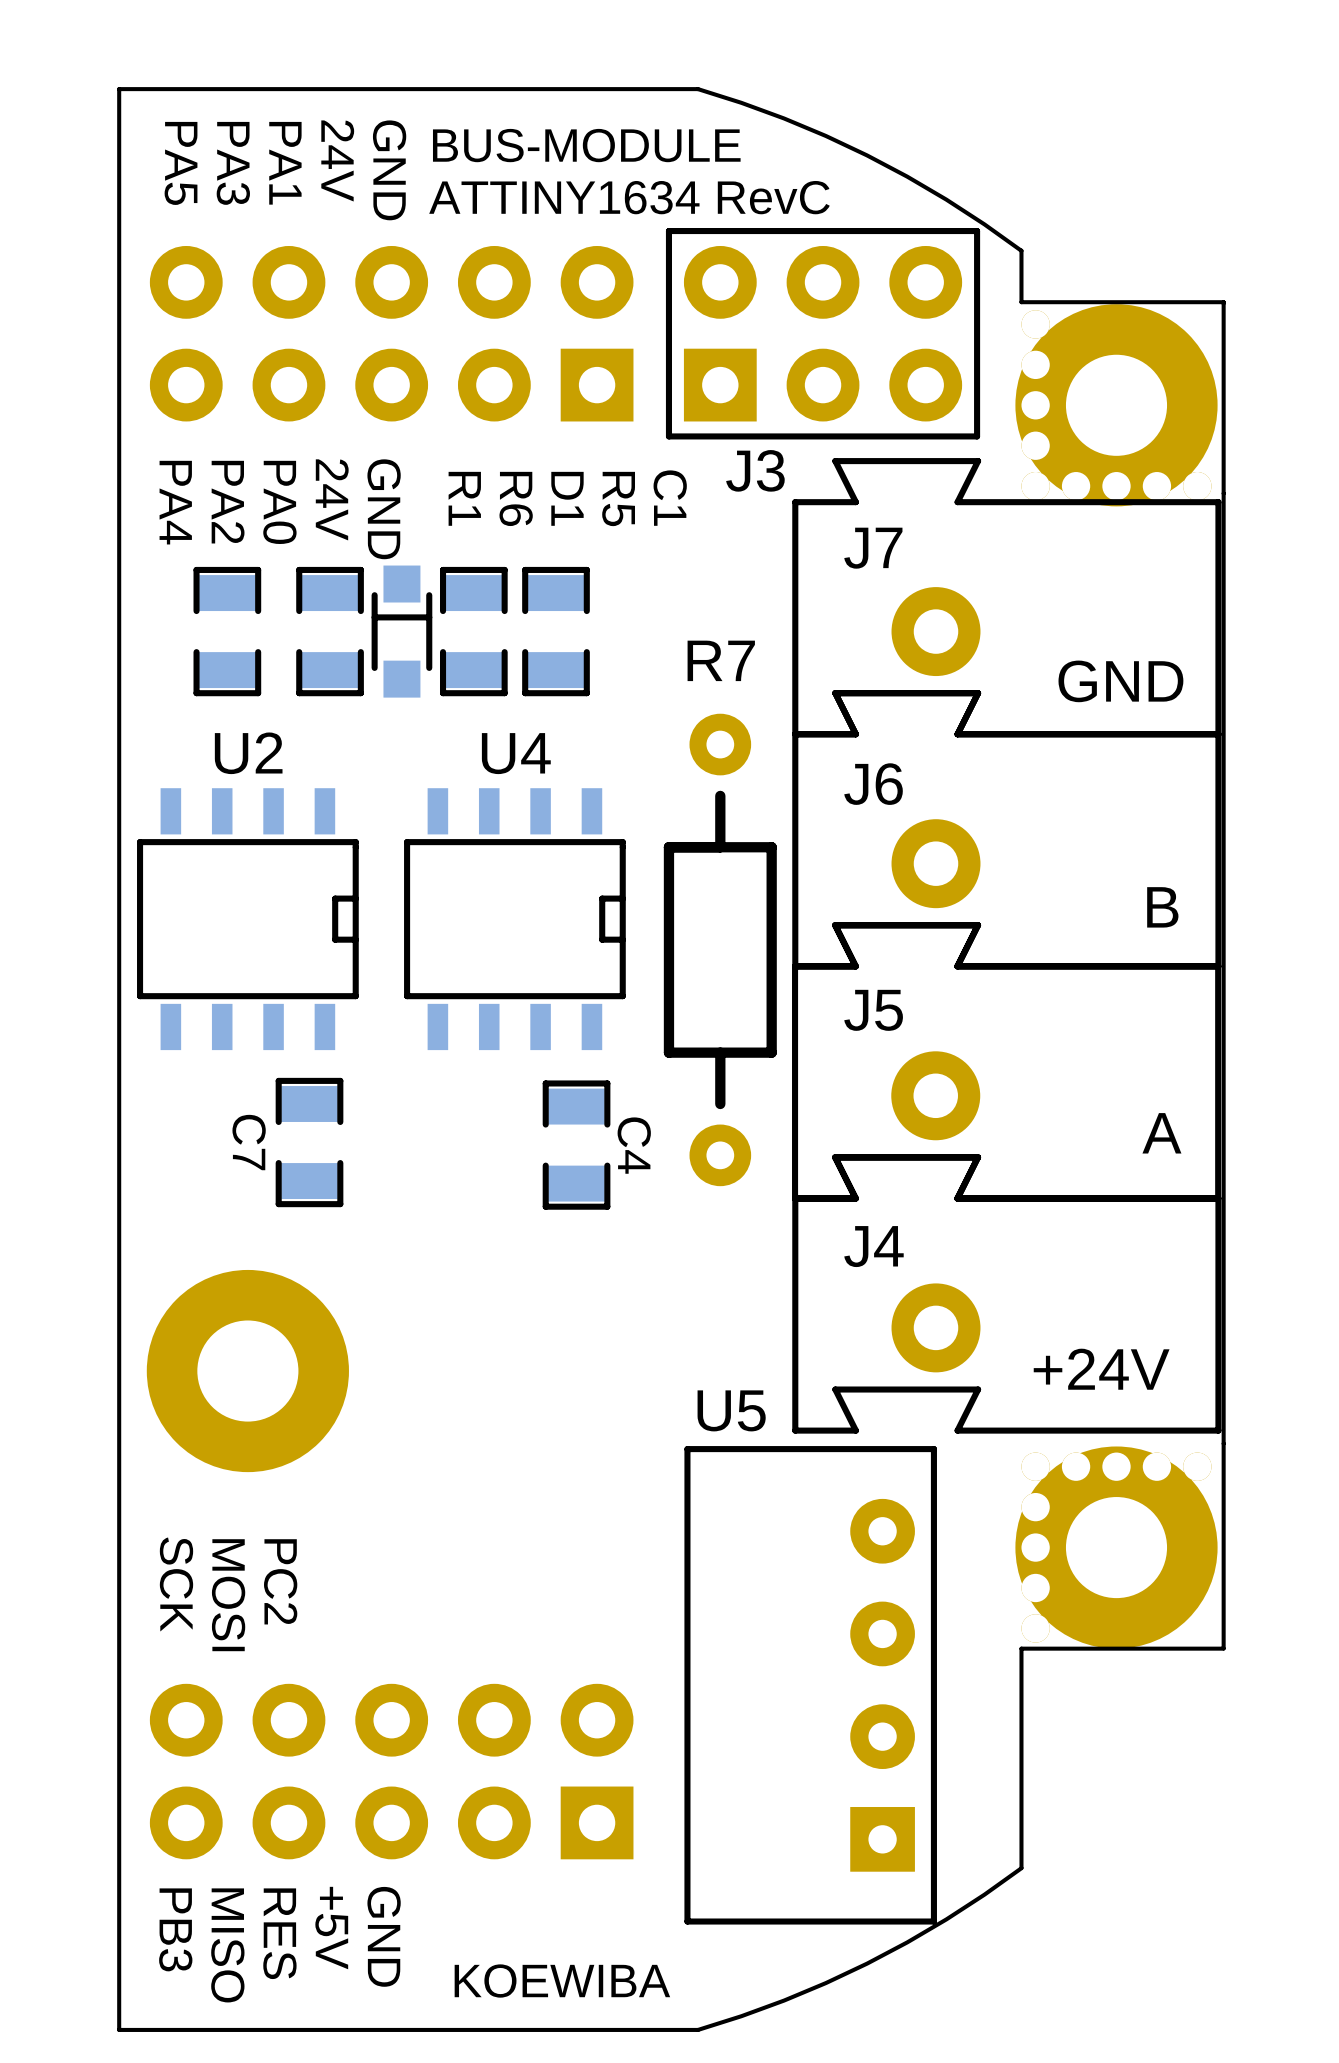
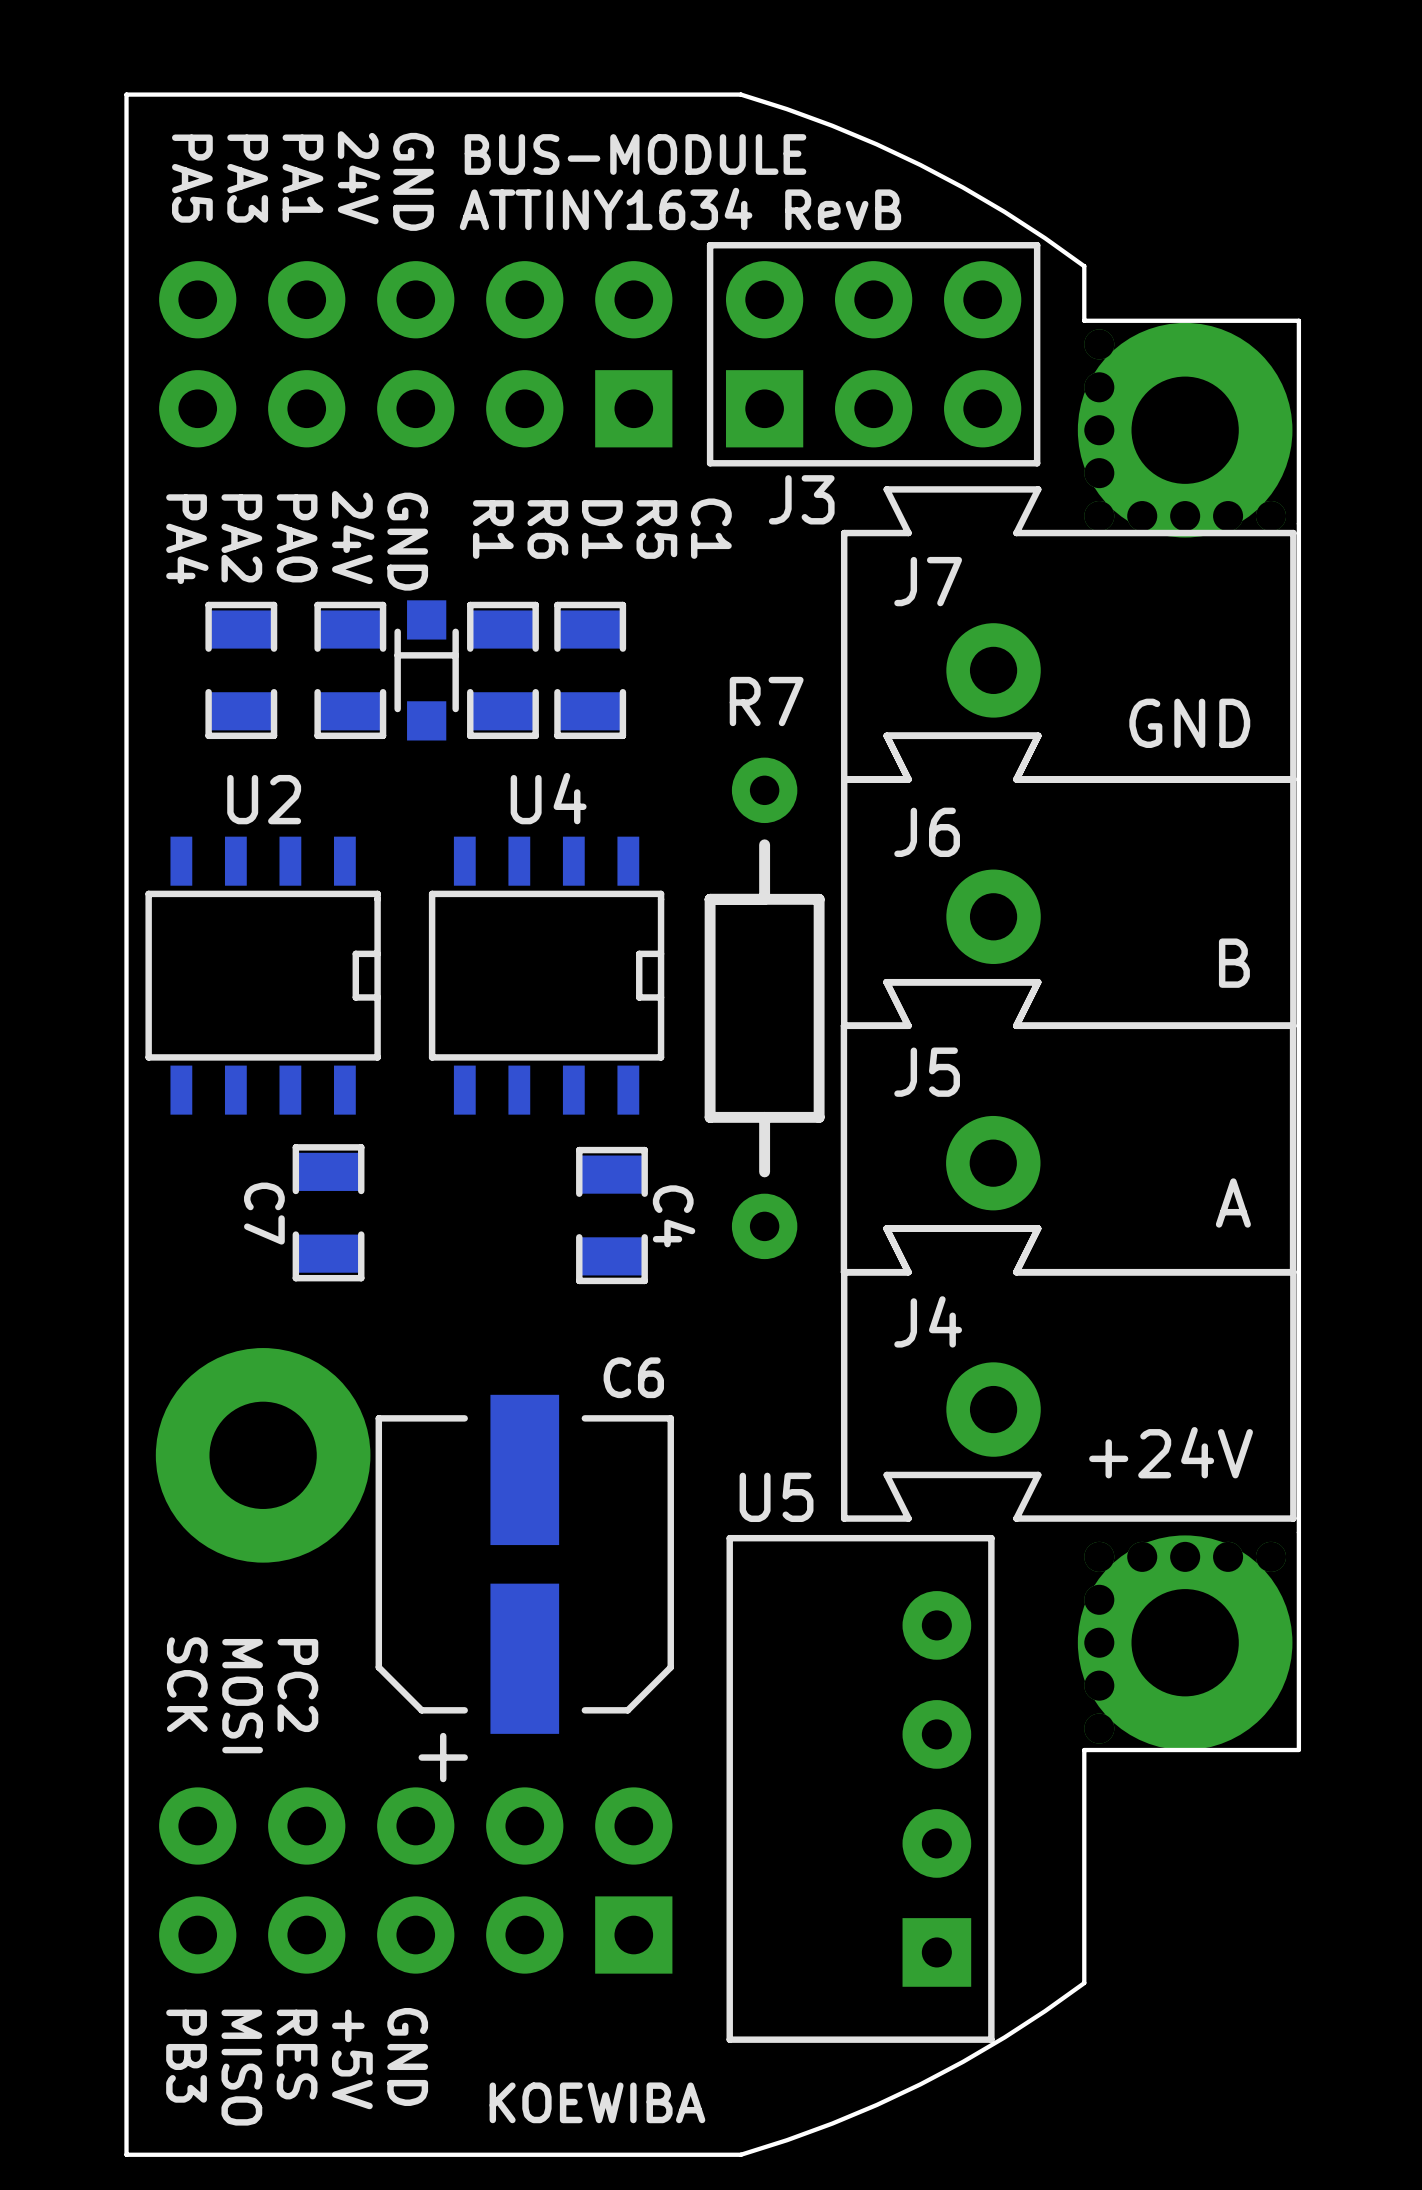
text: ATTINY1634 RevC (629, 197) -> ATTINY1634 RevB (680, 208)
C6: none -> (524, 1588)

